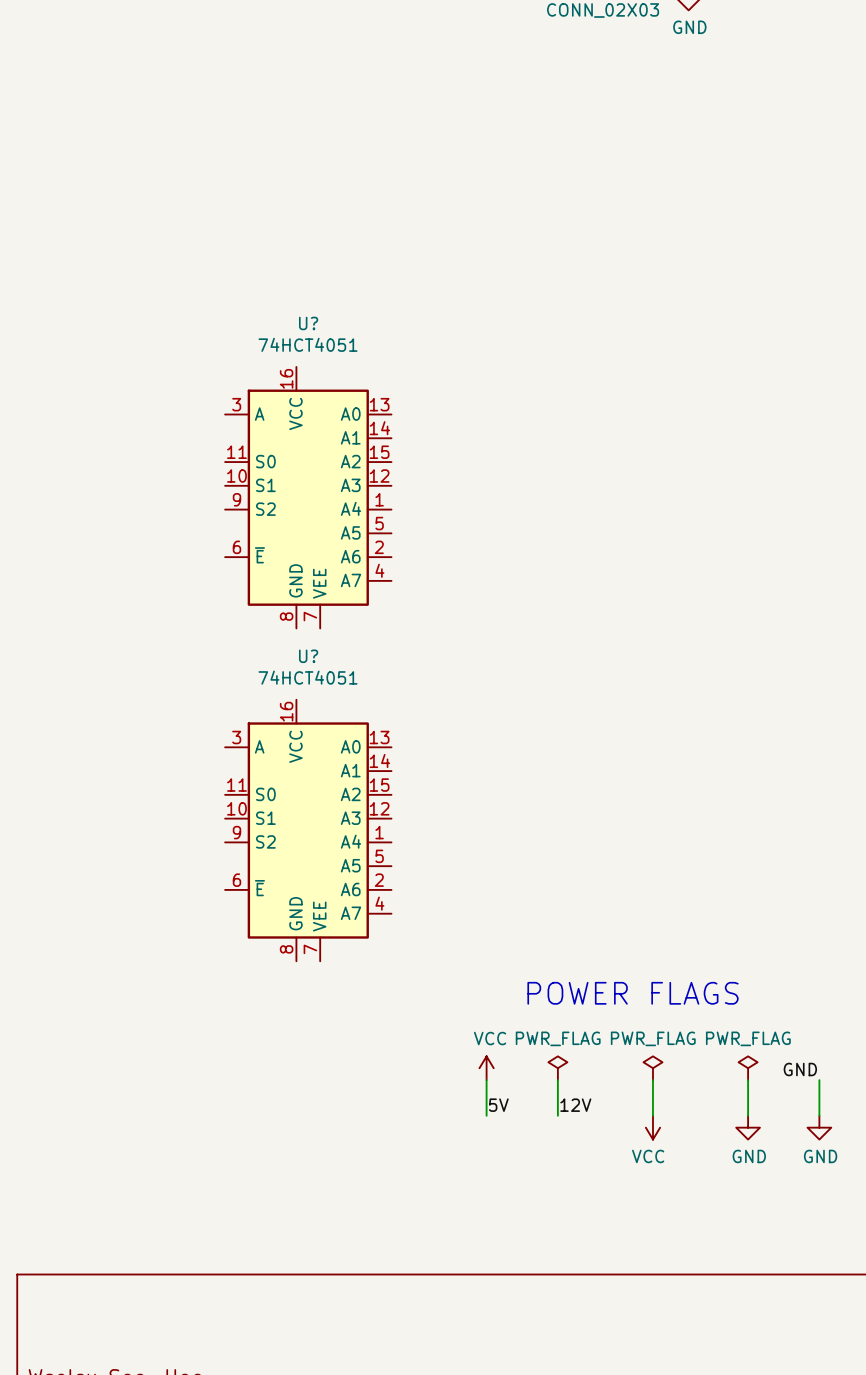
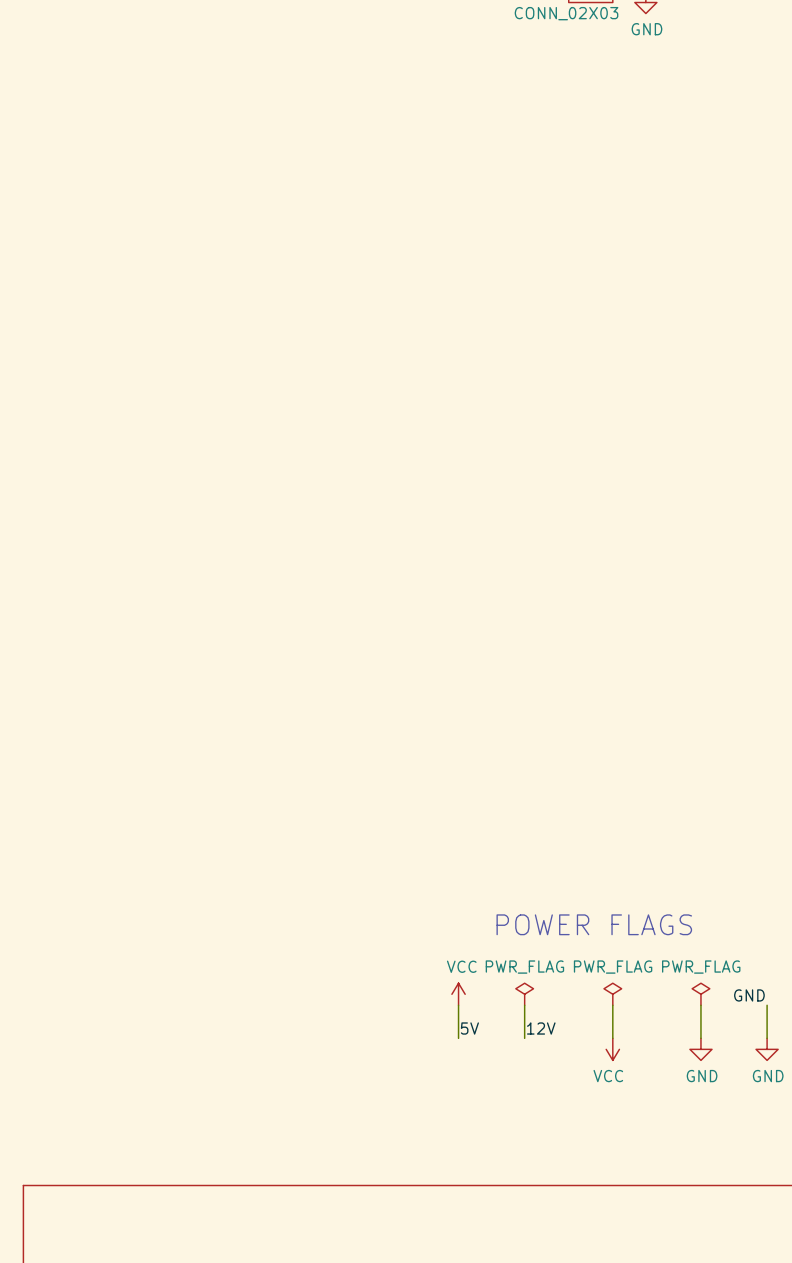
U?: 74HCT4051 (308, 497) -> none
U?: 74HCT4051 (308, 830) -> none

